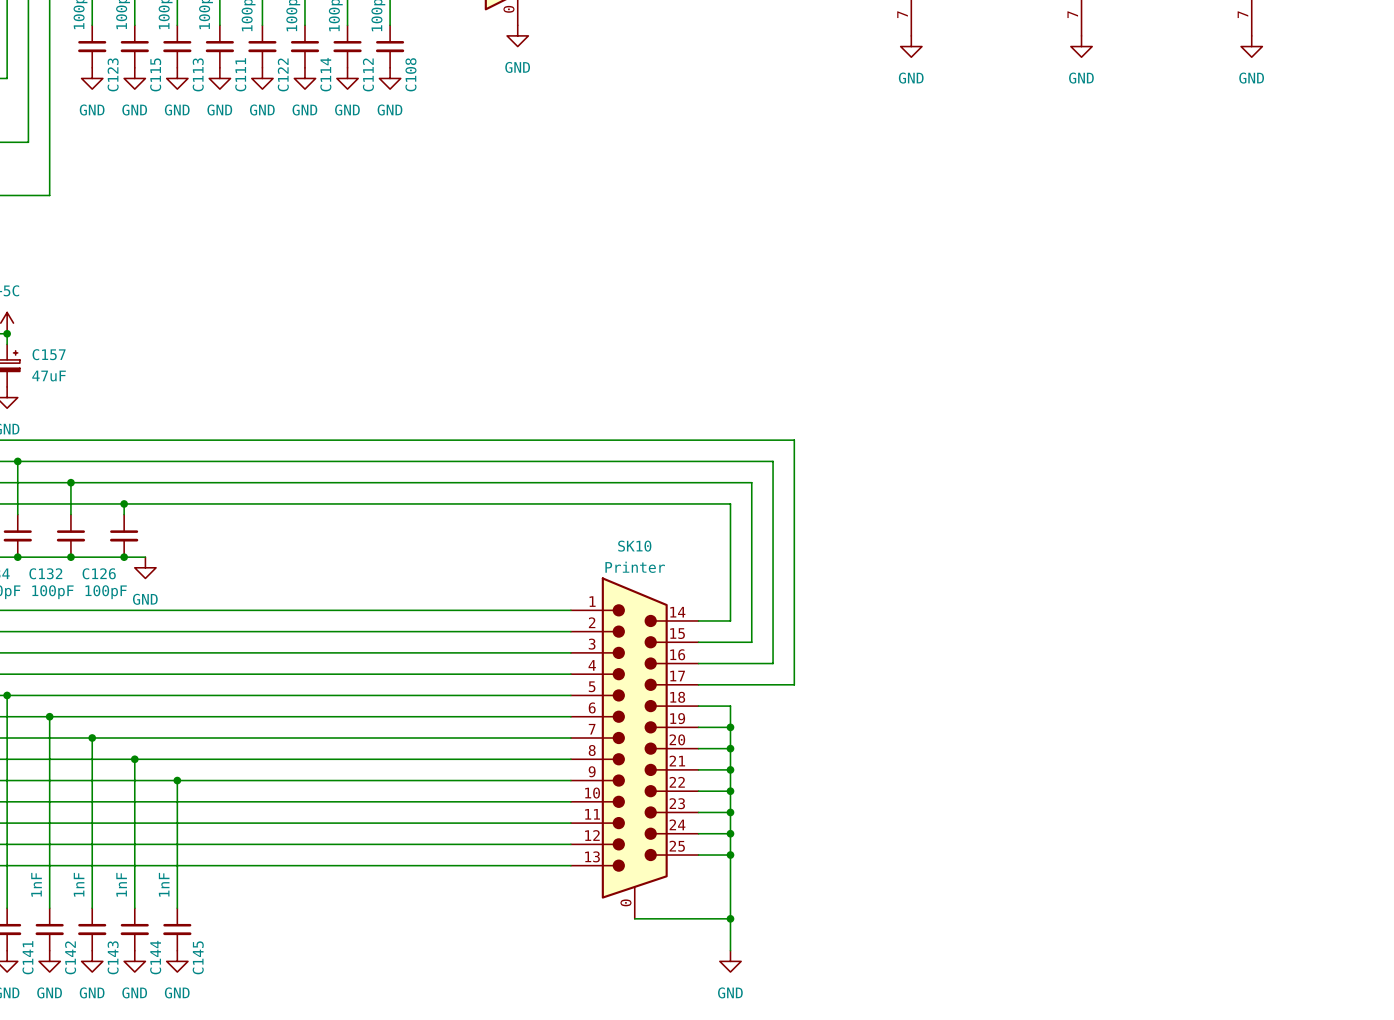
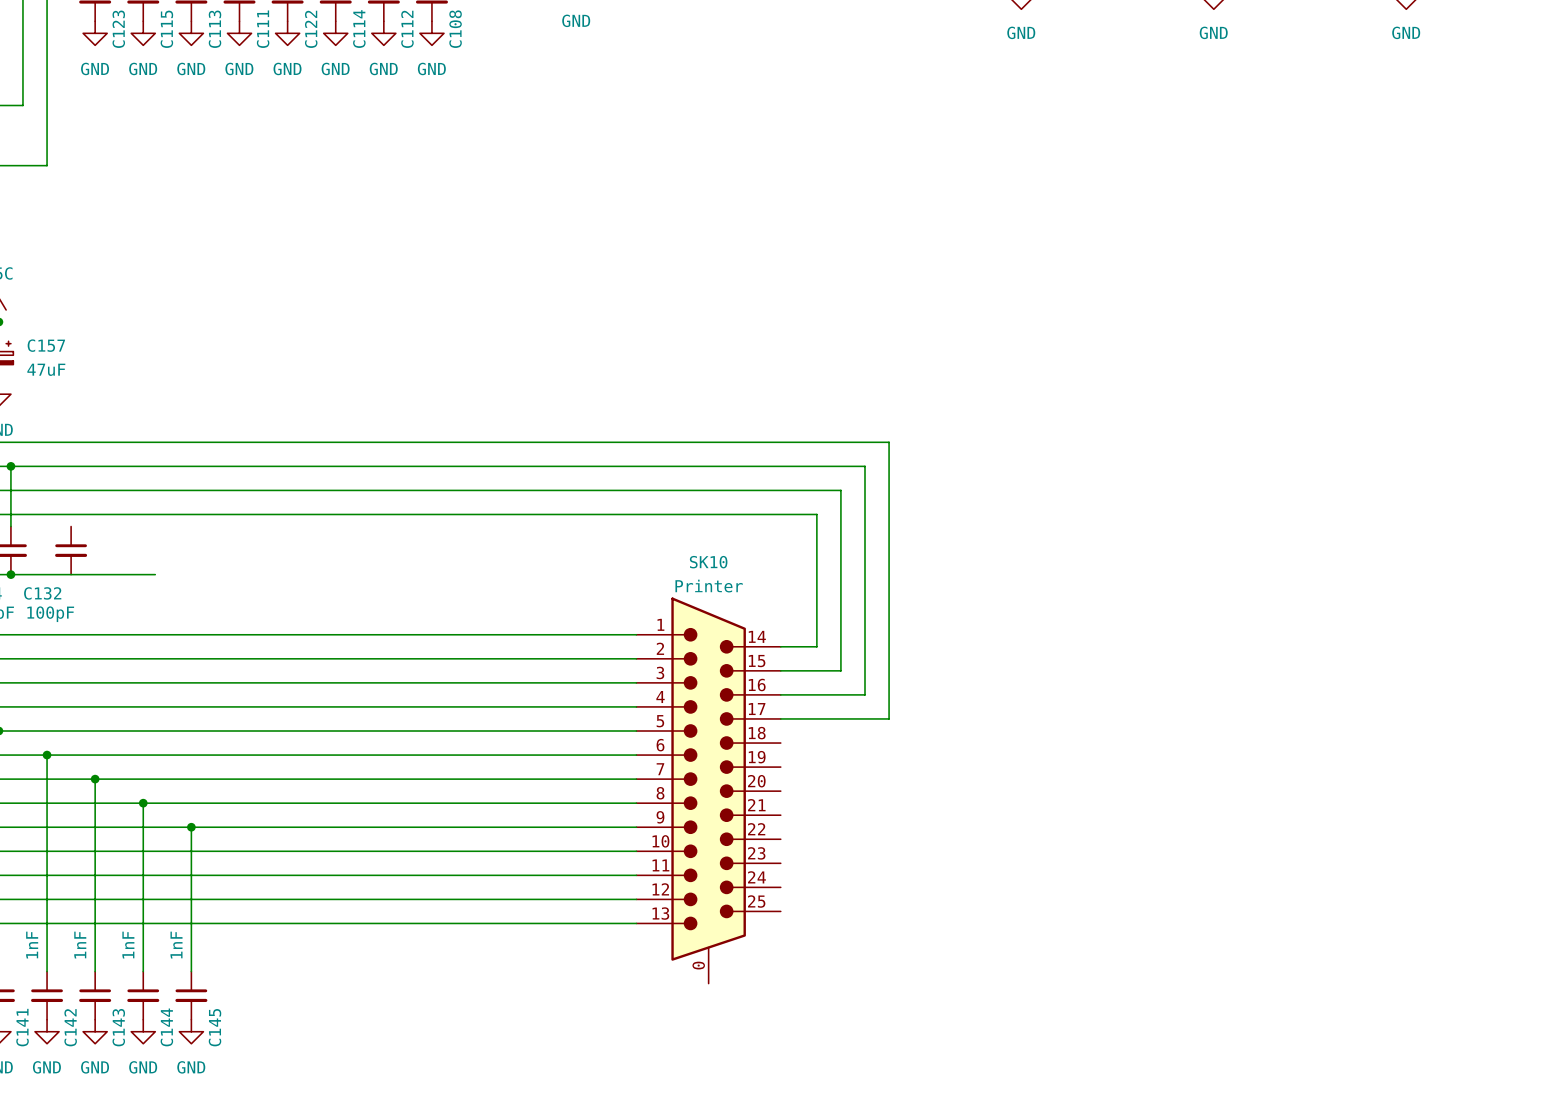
wire: (70, 482) (70, 514) -> none
junction: (70, 482) -> none
wire: (124, 503) (124, 514) -> none
junction: (124, 503) -> none
C126: 100pF (124, 535) -> none
junction: (70, 557) -> none
junction: (124, 557) -> none
power symbol: GND (145, 567) -> none
wire: (698, 706) (730, 706) (730, 950) -> none
wire: (698, 727) (730, 727) -> none
junction: (730, 727) -> none
wire: (698, 748) (730, 748) -> none
junction: (730, 748) -> none
wire: (698, 769) (730, 769) -> none
junction: (730, 769) -> none
wire: (698, 791) (730, 791) -> none
junction: (730, 791) -> none
wire: (698, 812) (730, 812) -> none
junction: (730, 812) -> none
wire: (698, 833) (730, 833) -> none
junction: (730, 833) -> none
wire: (698, 855) (730, 855) -> none
junction: (730, 855) -> none
wire: (634, 918) (730, 918) -> none
junction: (730, 918) -> none
power symbol: GND (730, 961) -> none

